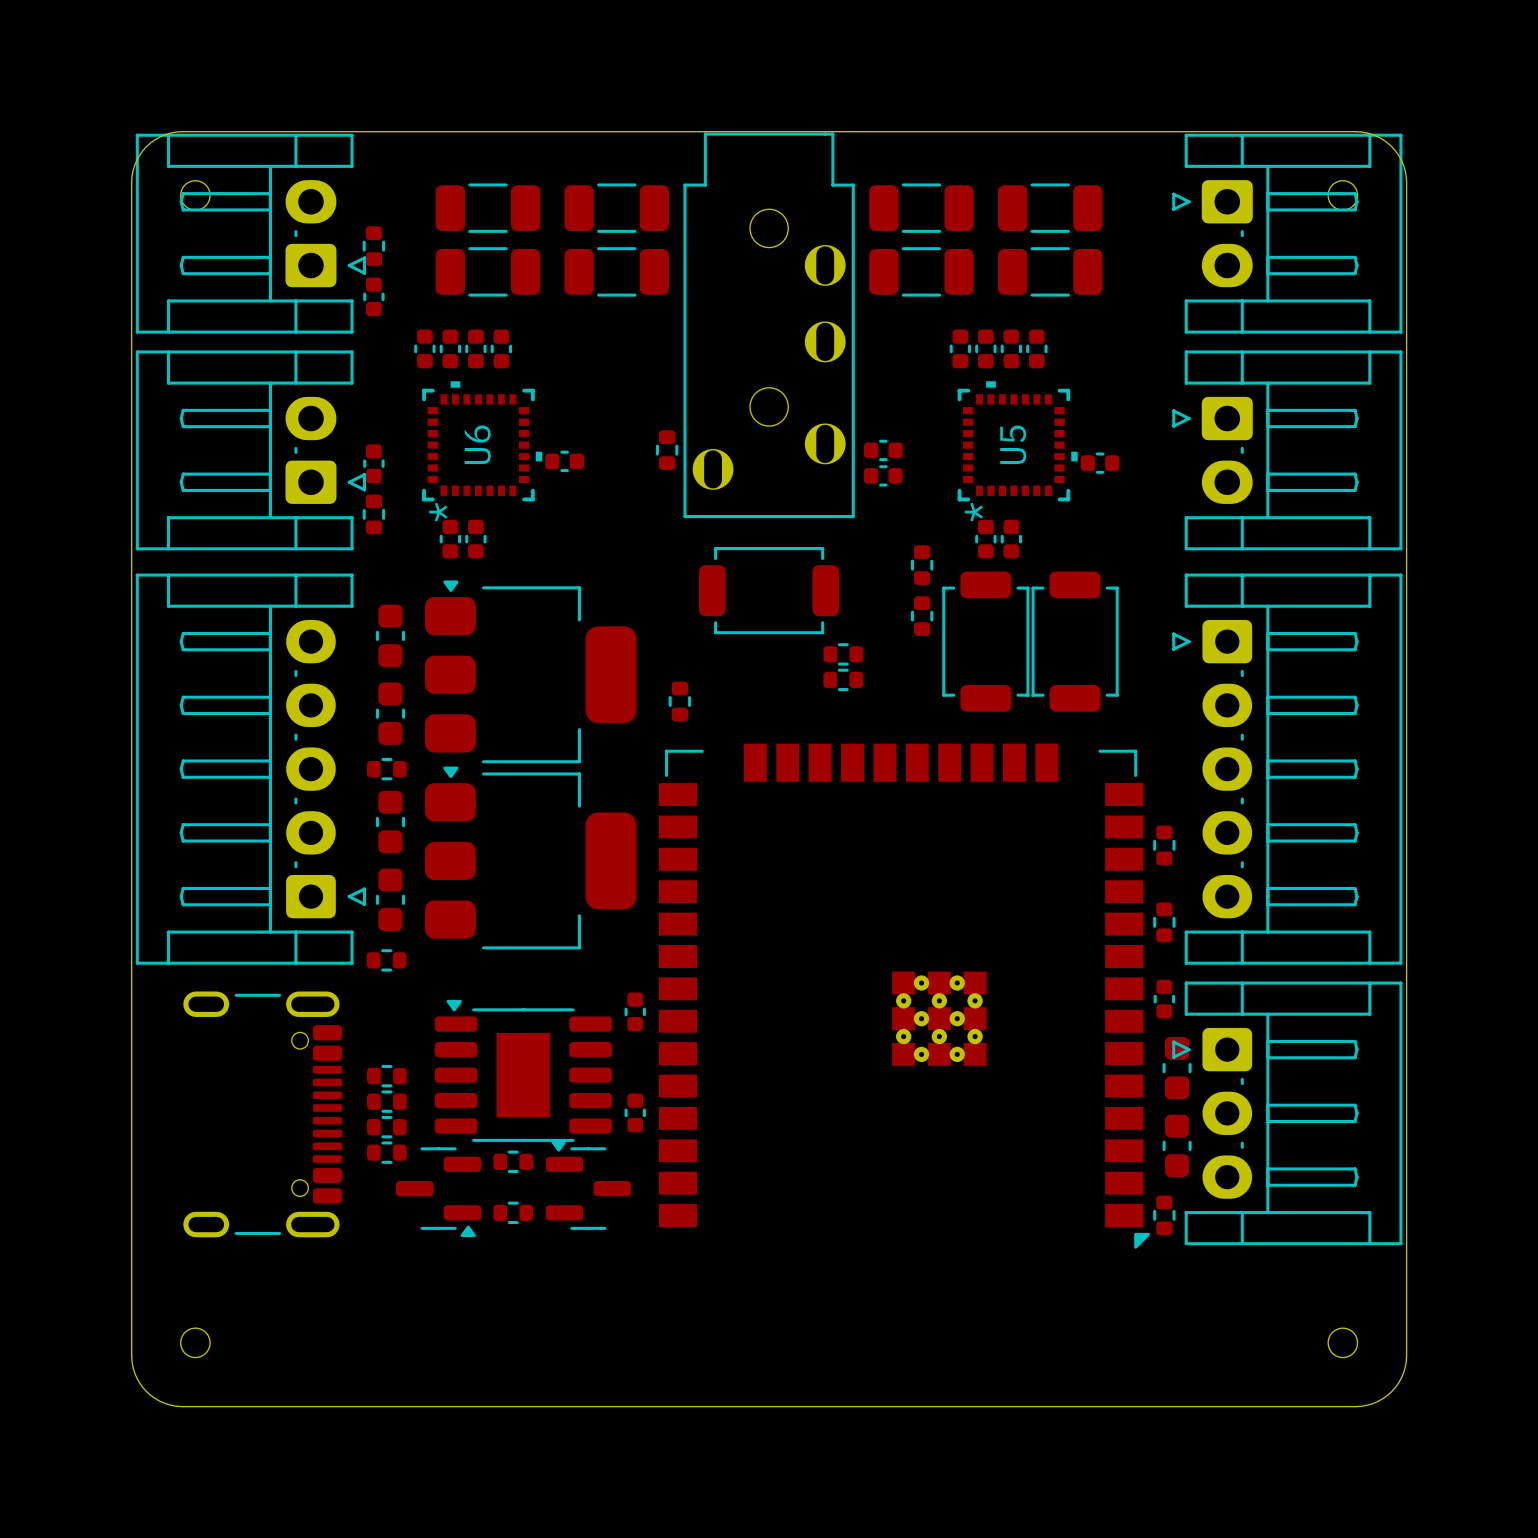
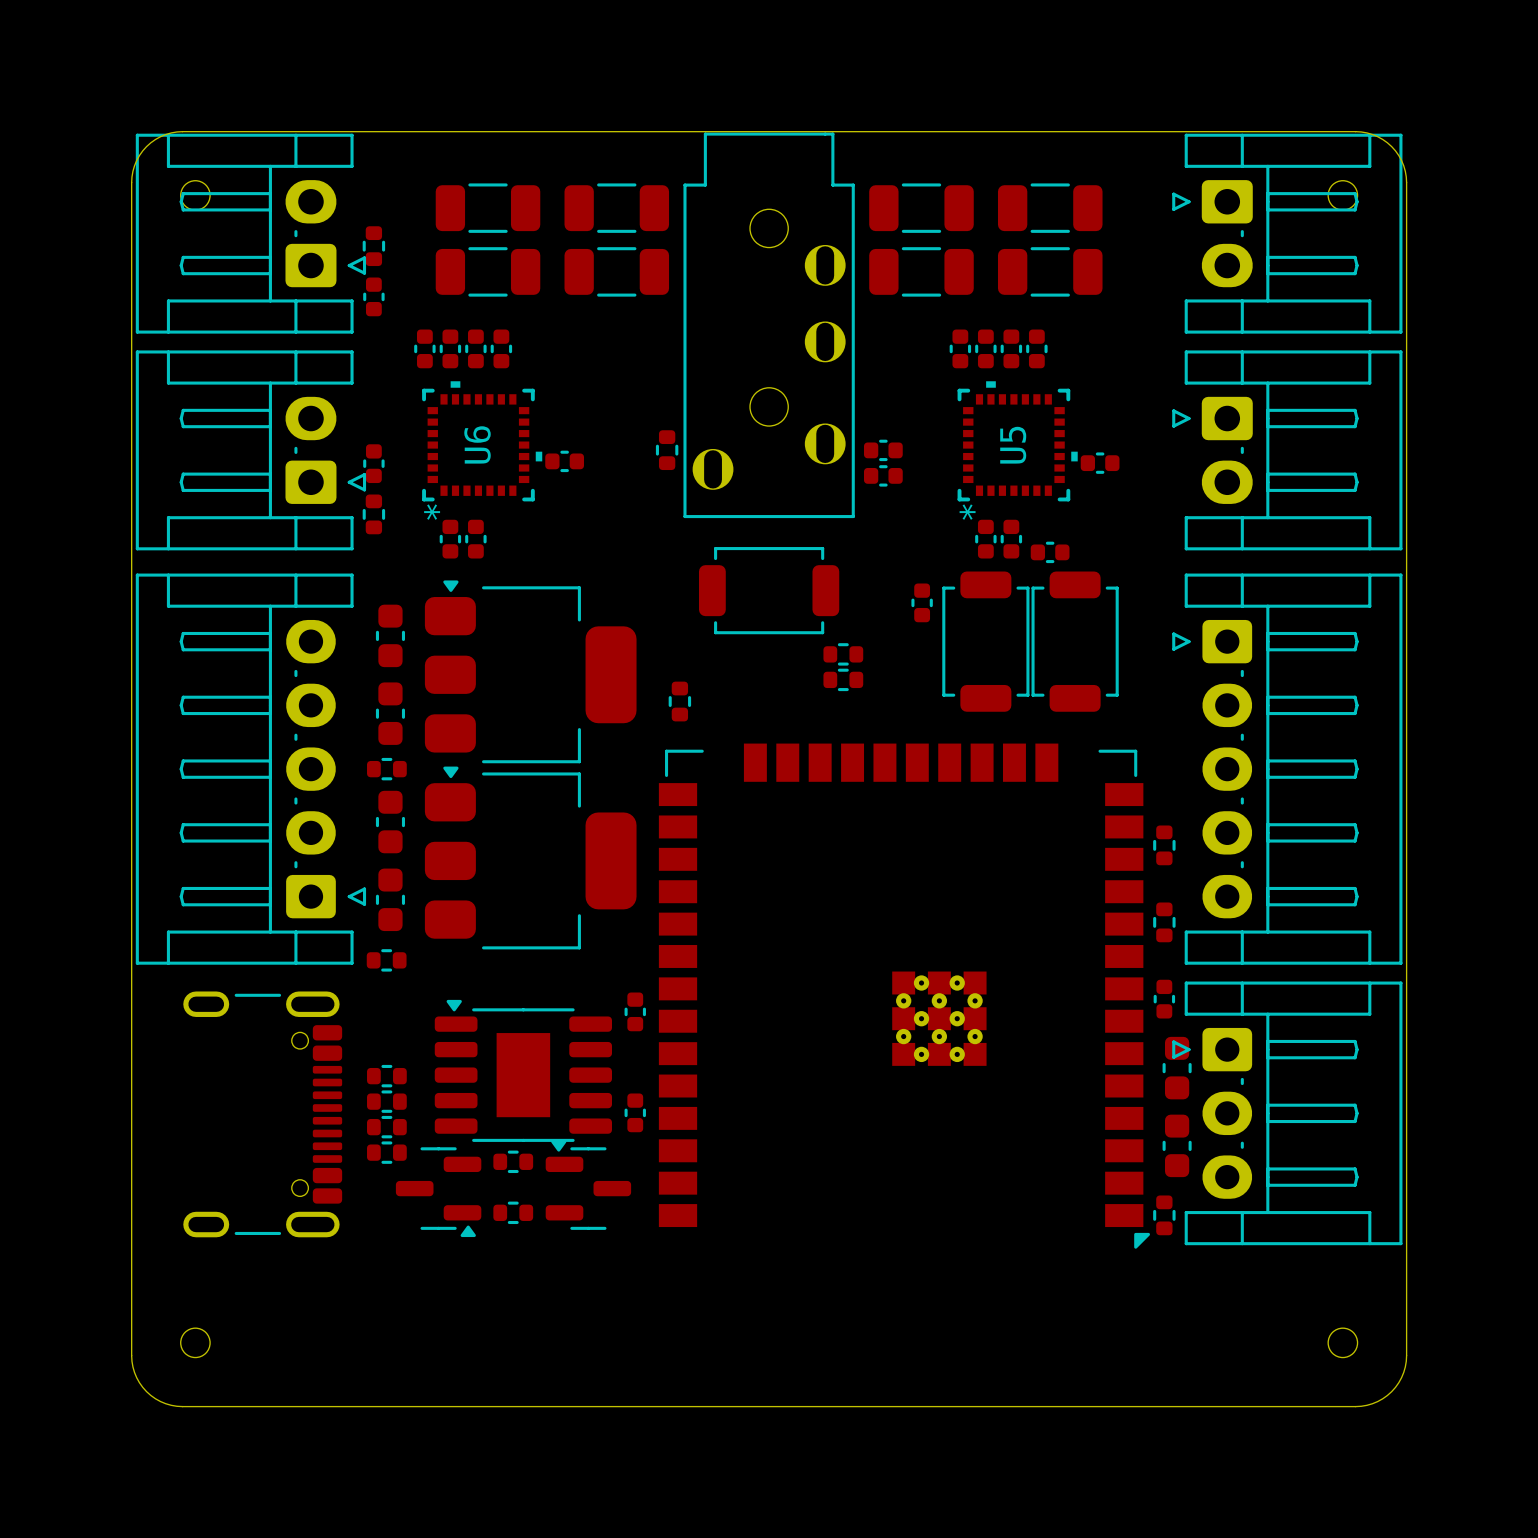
part: none -> (1050, 552)
part: (922, 565) -> none
part footprint: [910, 596, 934, 637] -> [911, 583, 933, 623]

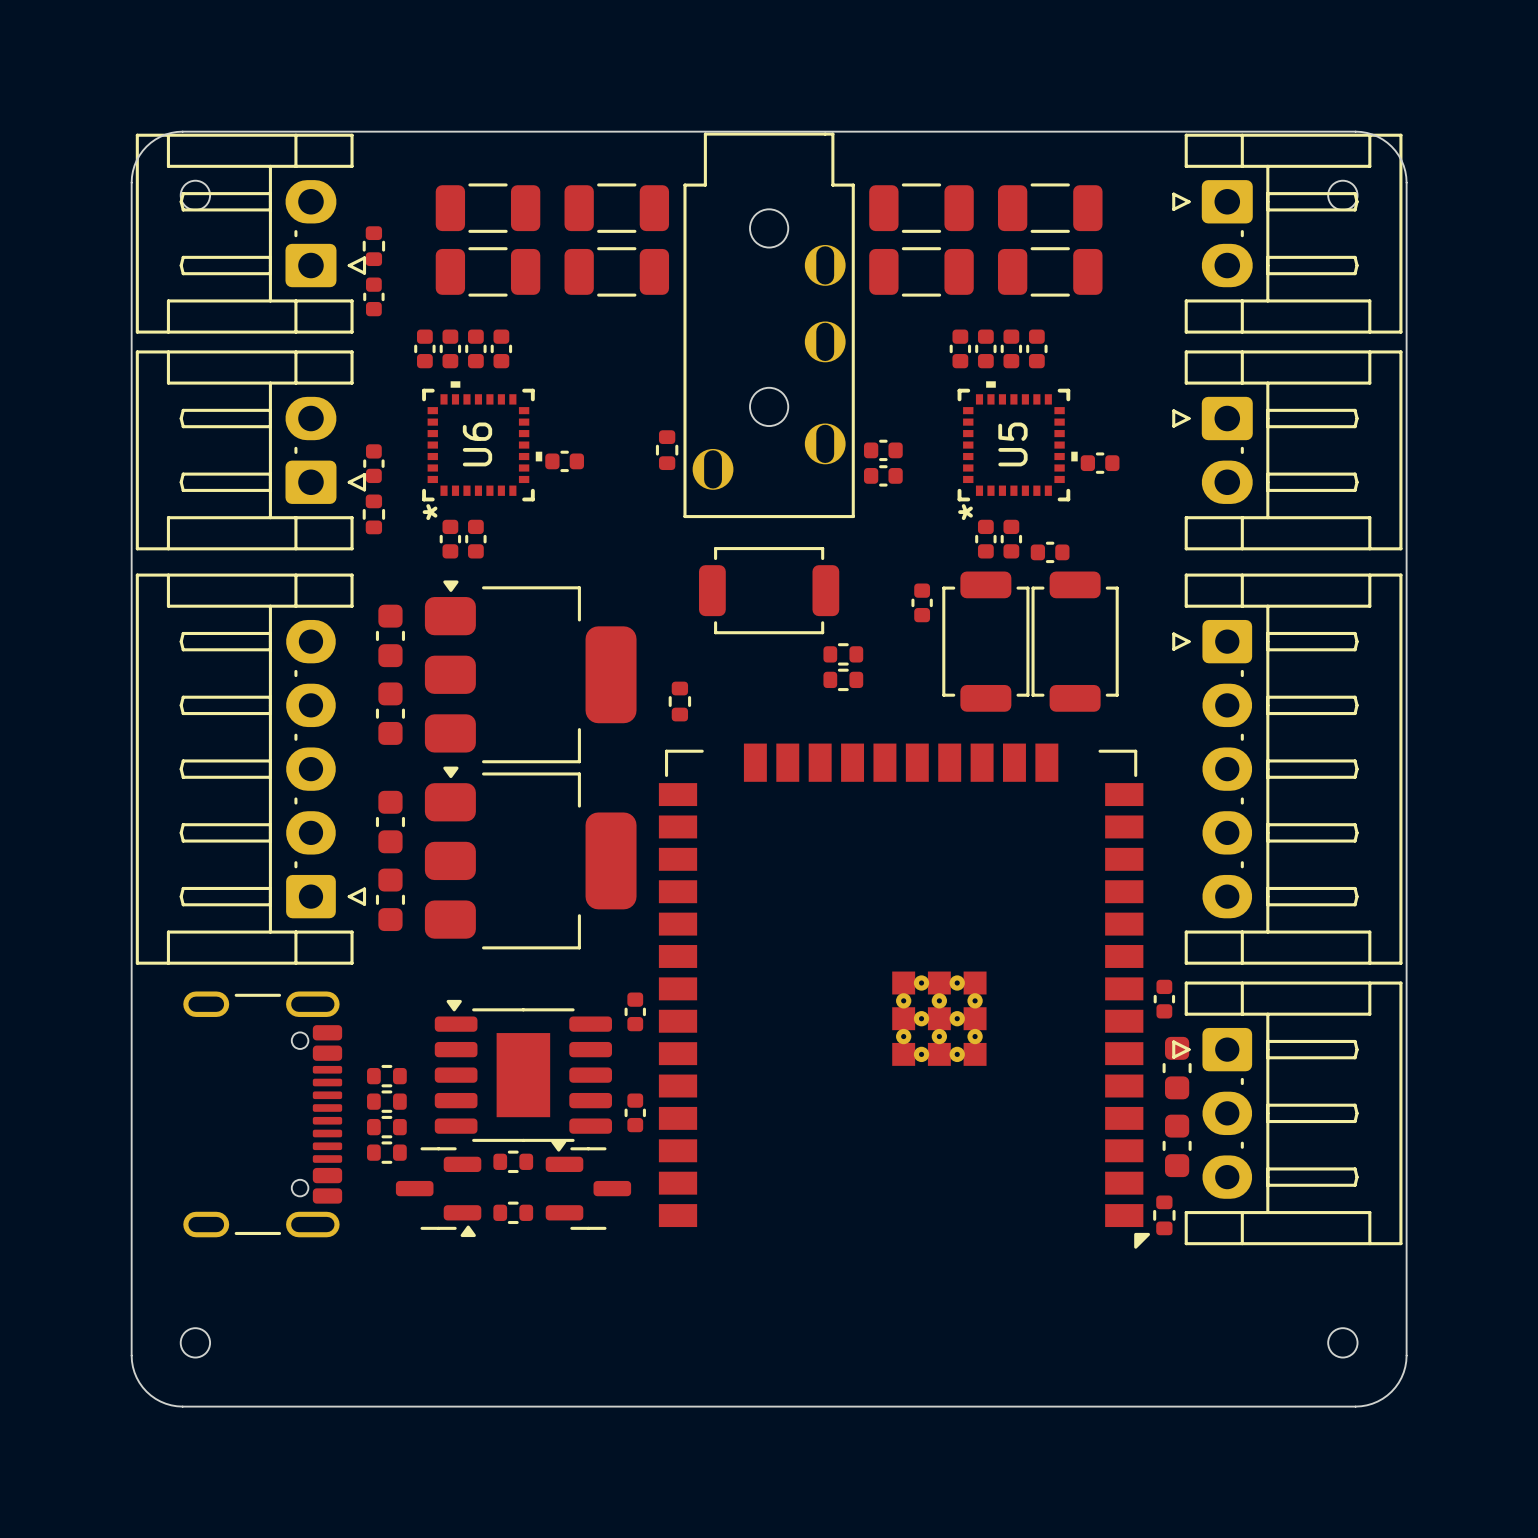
part: (386, 769) -> none
part: (1164, 845) -> none
part: (1164, 922) -> none
part: (386, 960) -> none

